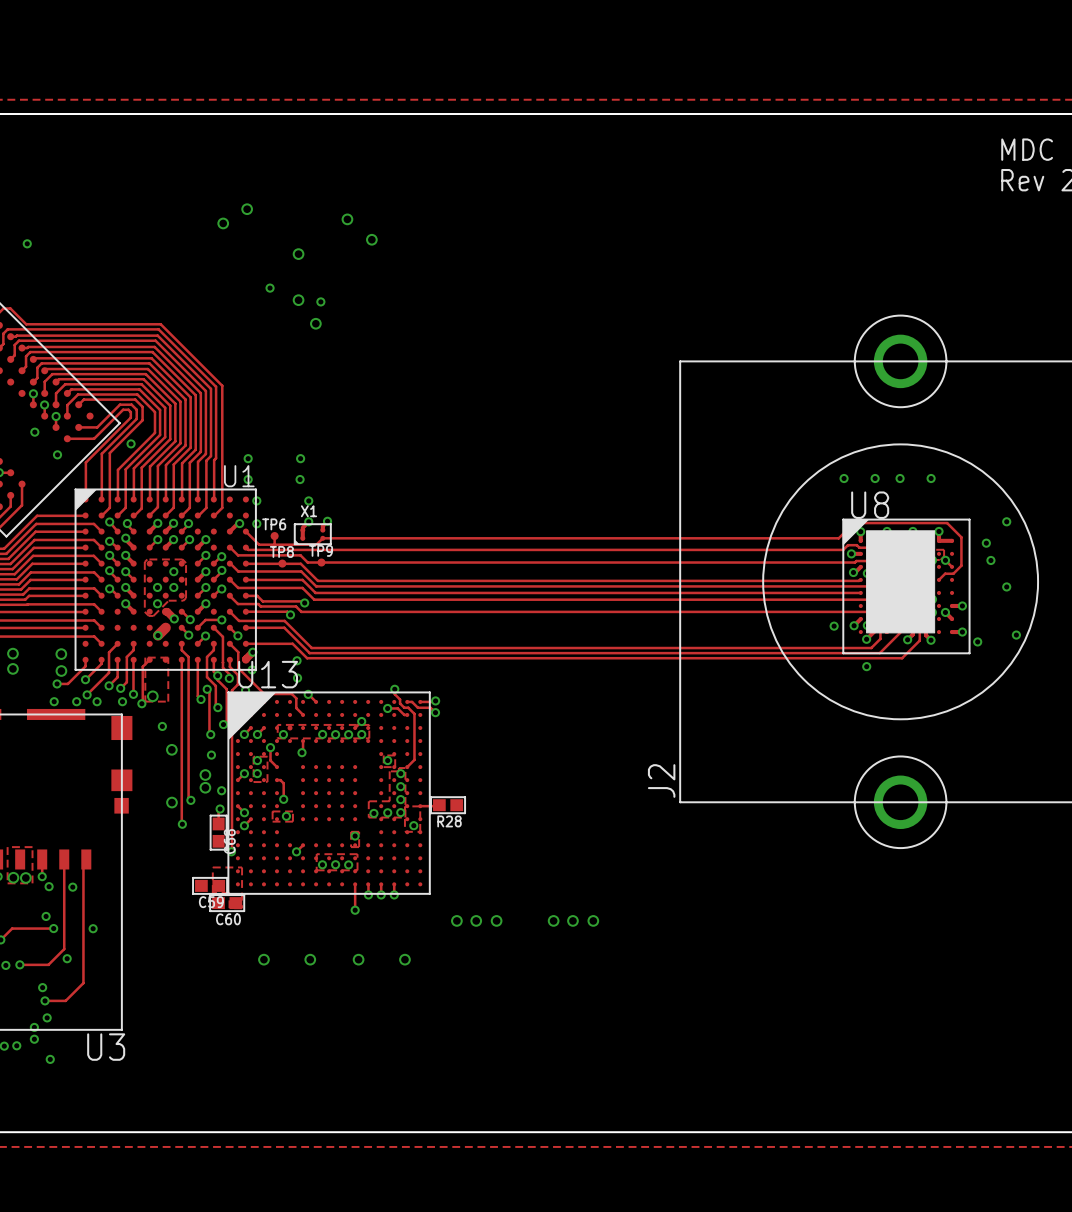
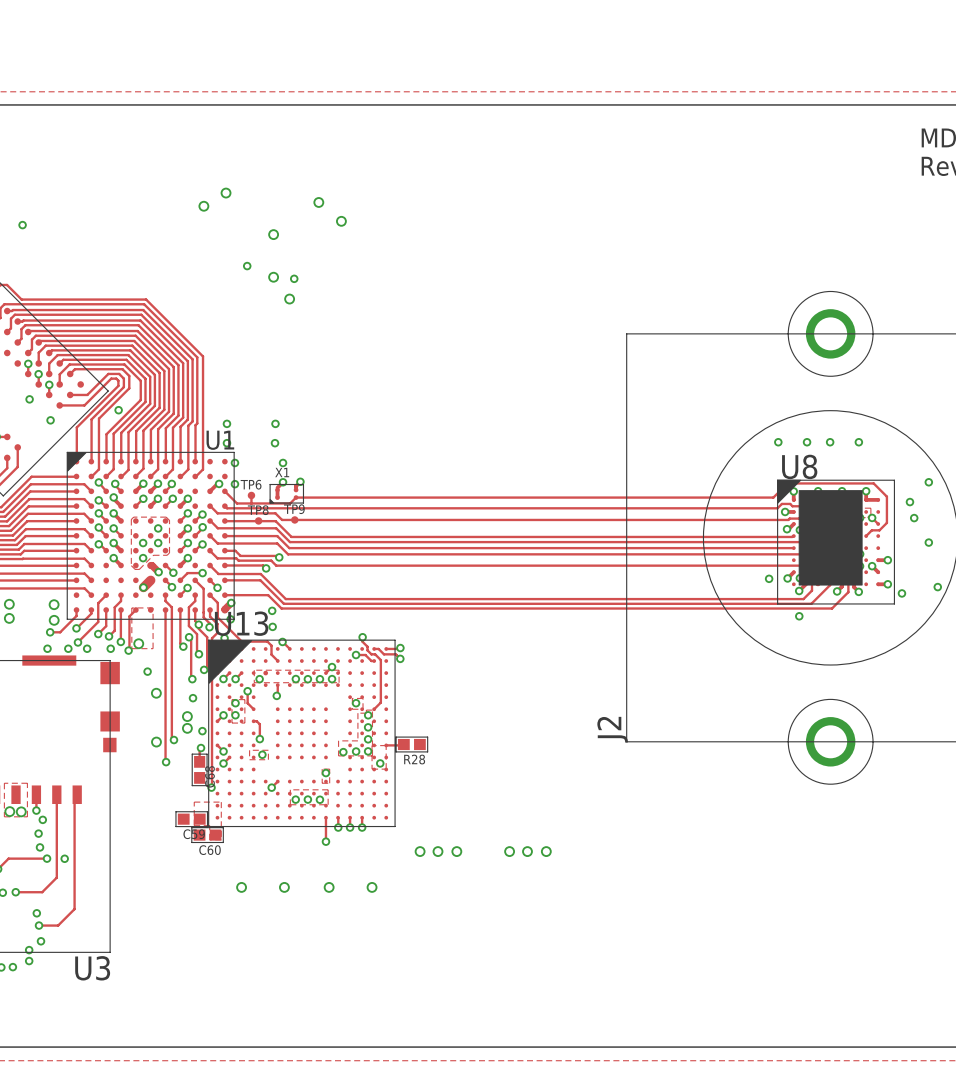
via: (72, 887) -> none
via: none -> (38, 833)
via: none -> (64, 858)
via: (93, 928) -> none
via: (67, 958) -> none
via: (50, 1059) -> none

